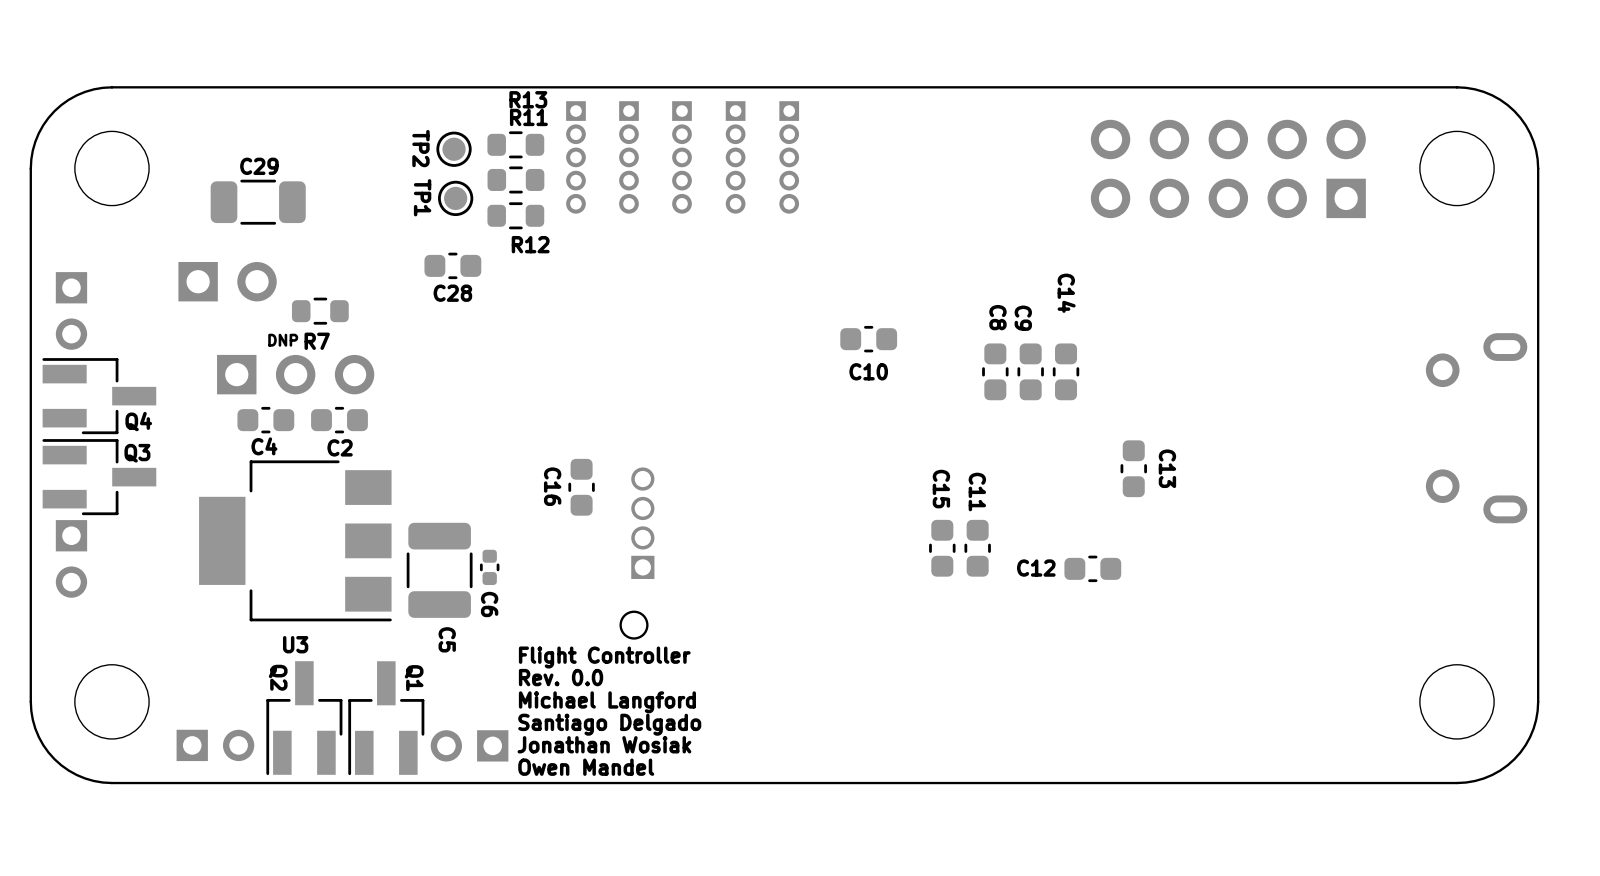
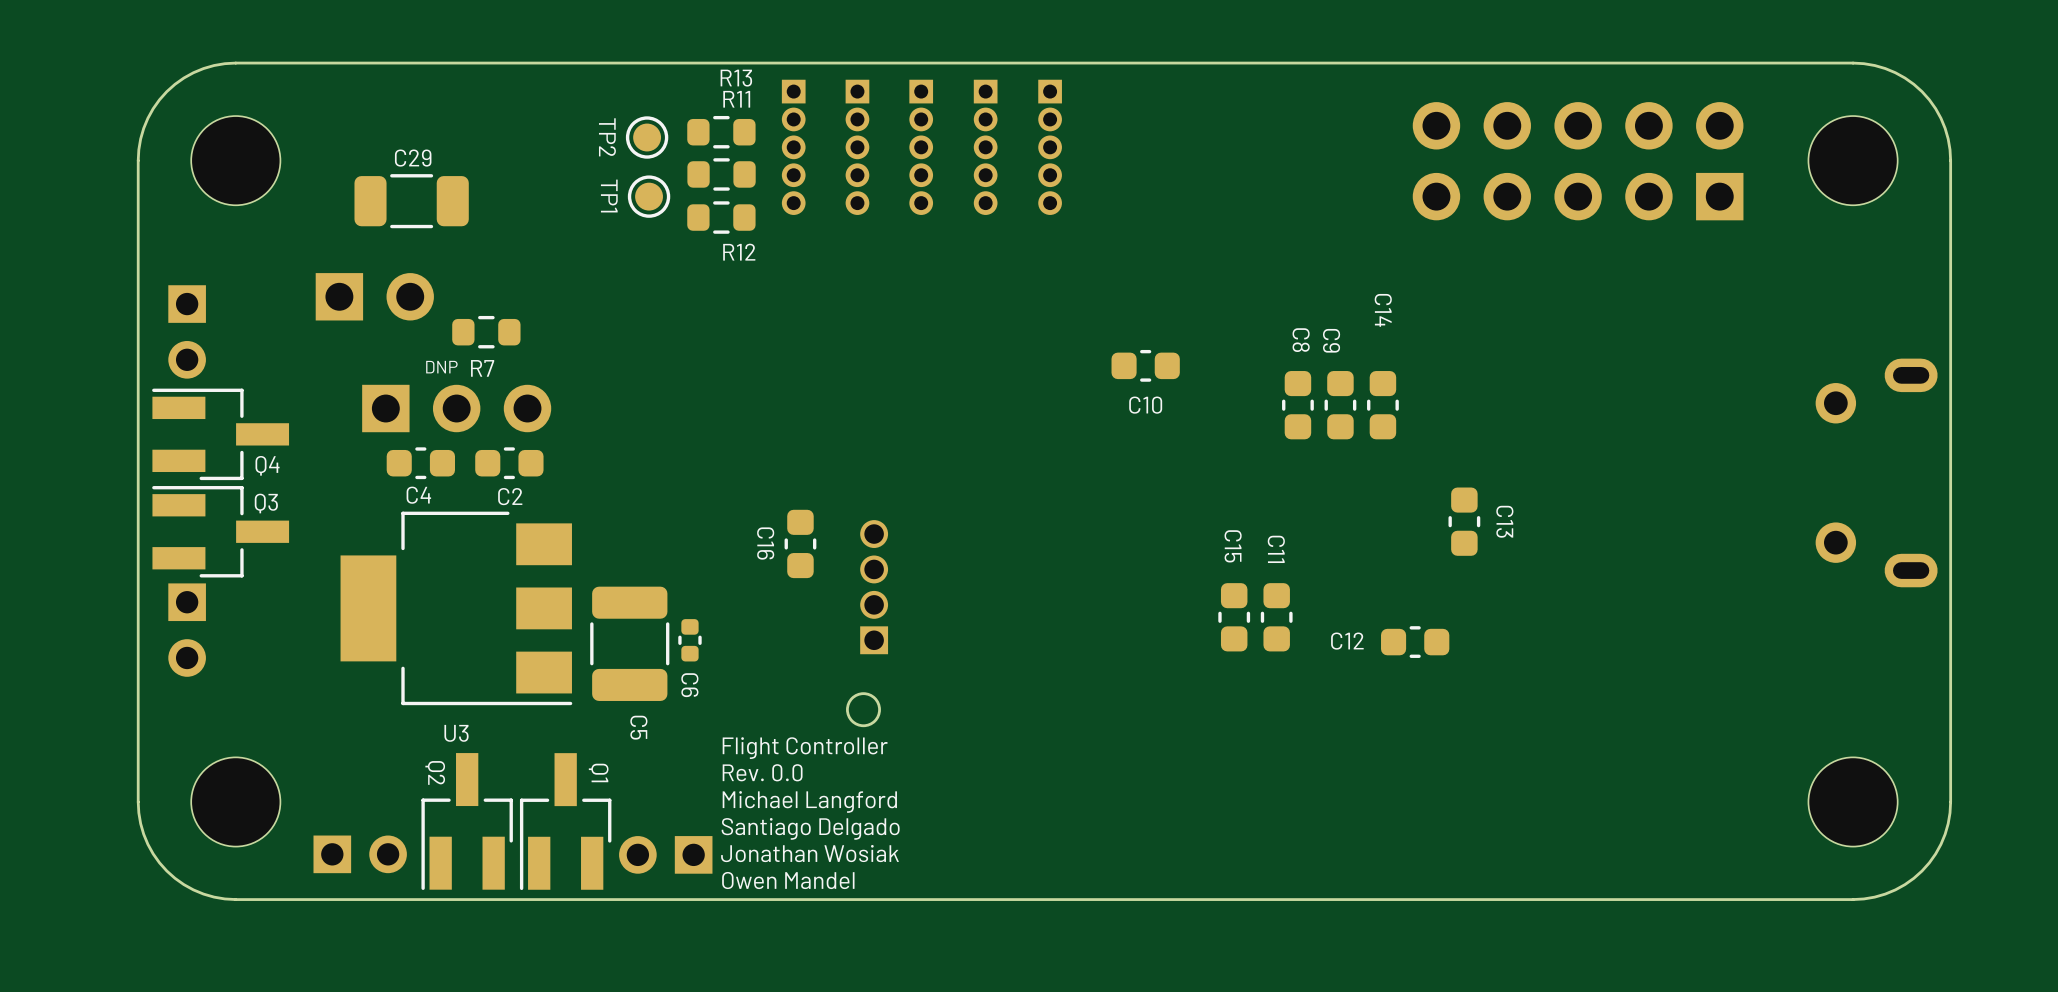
C28: (452, 265) -> none

